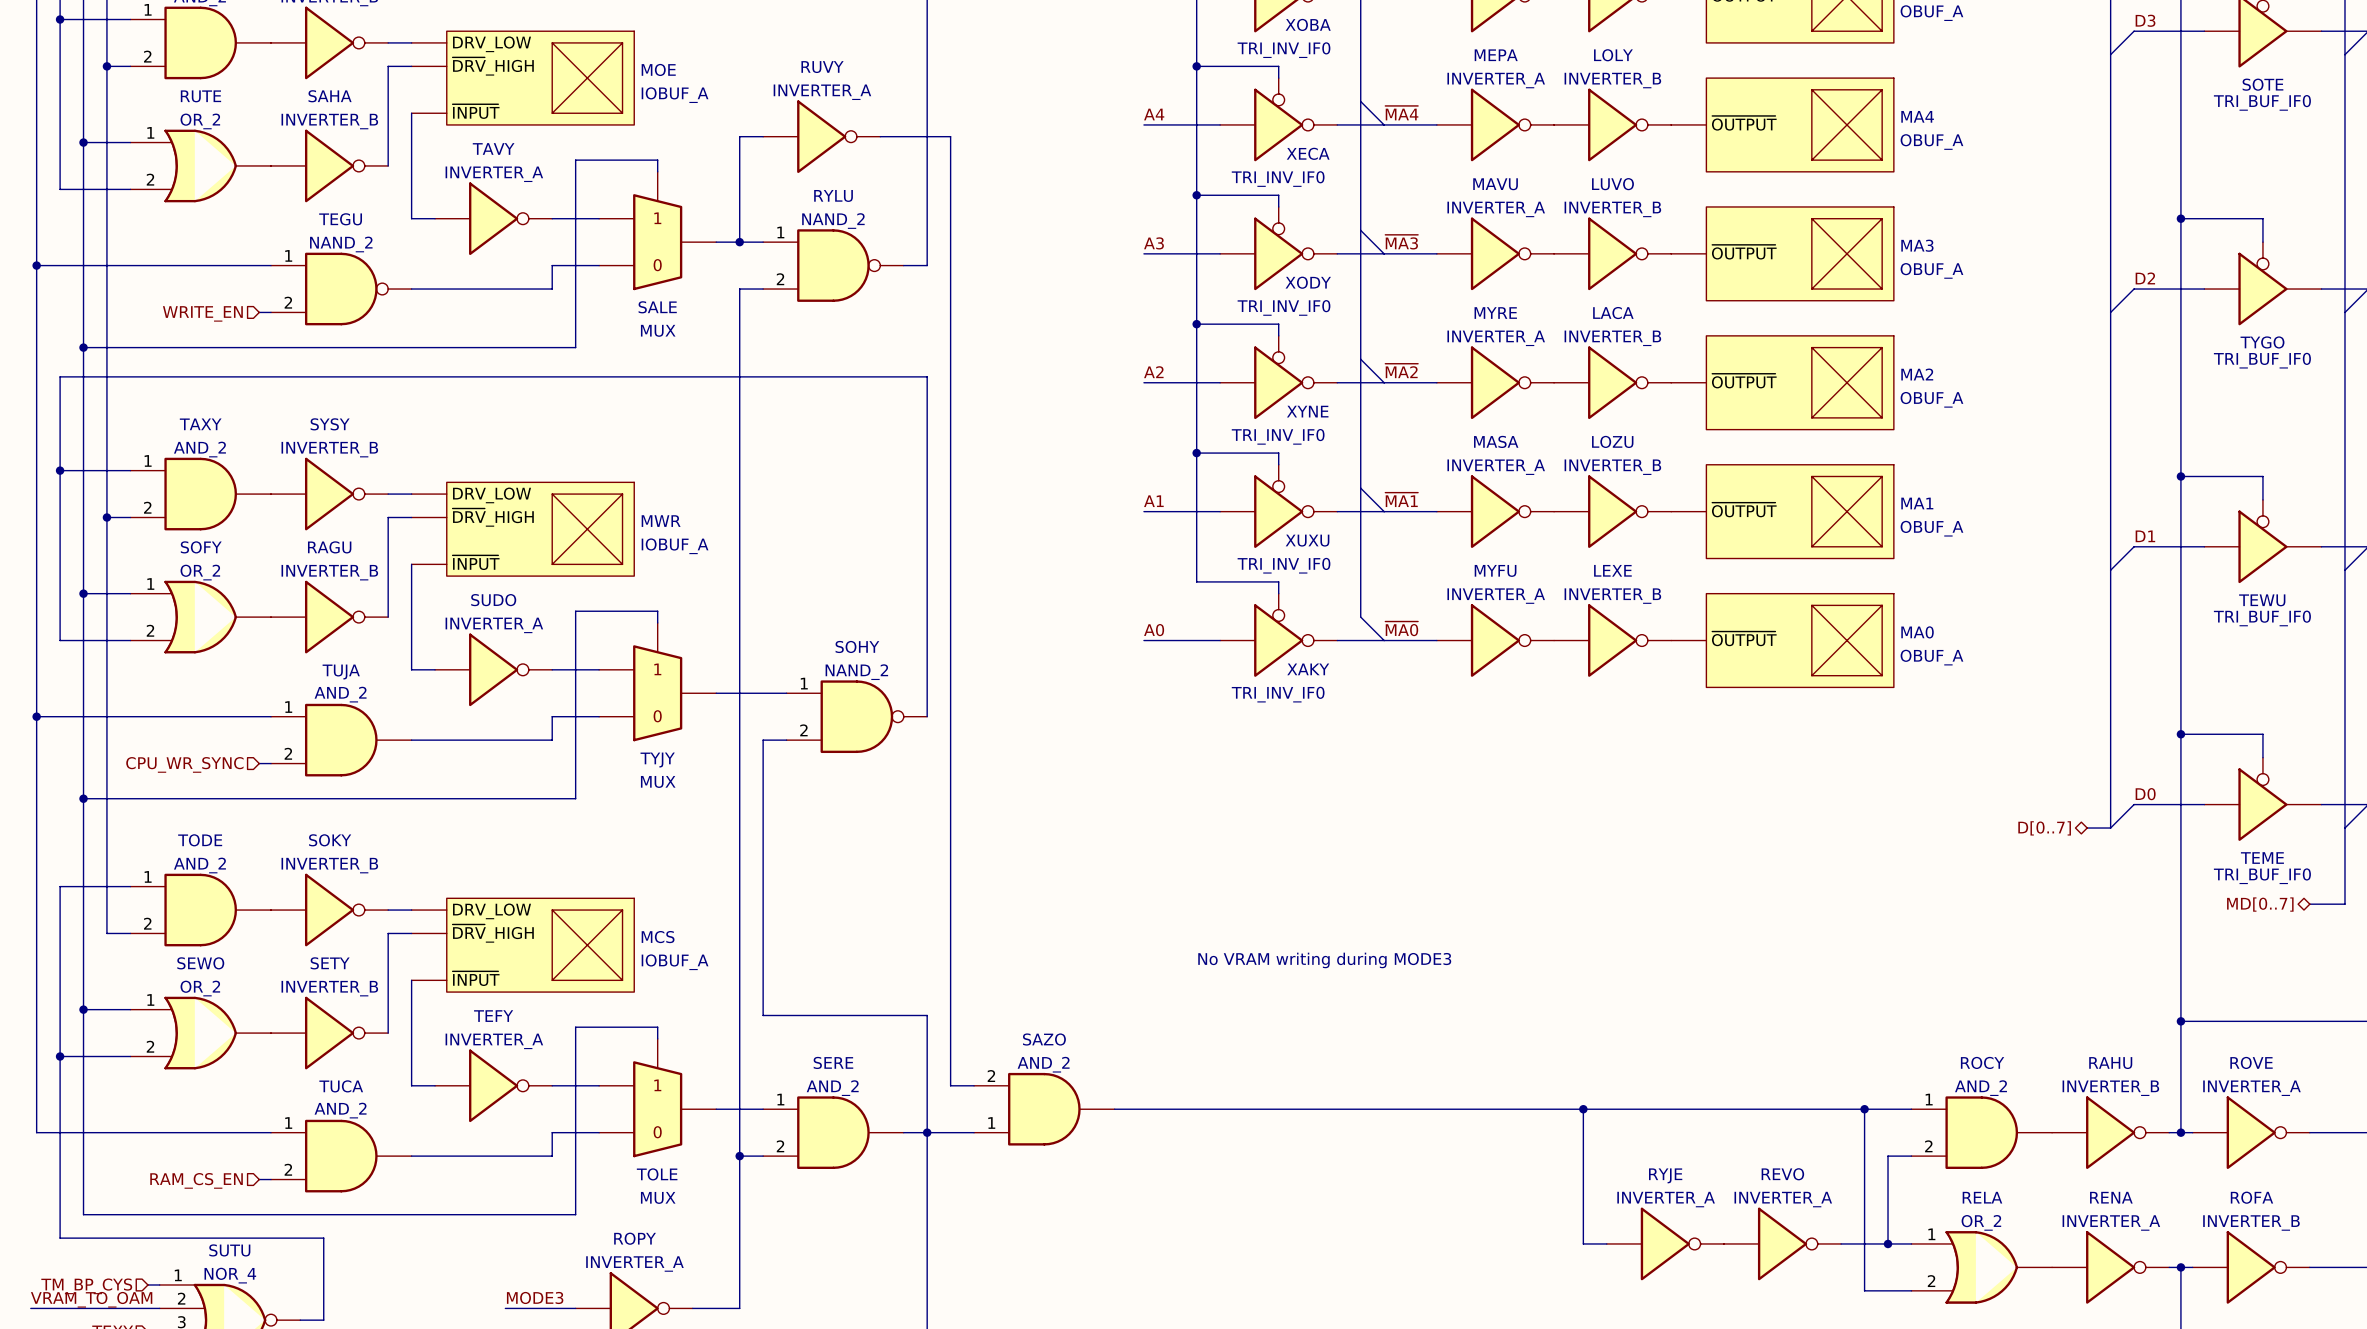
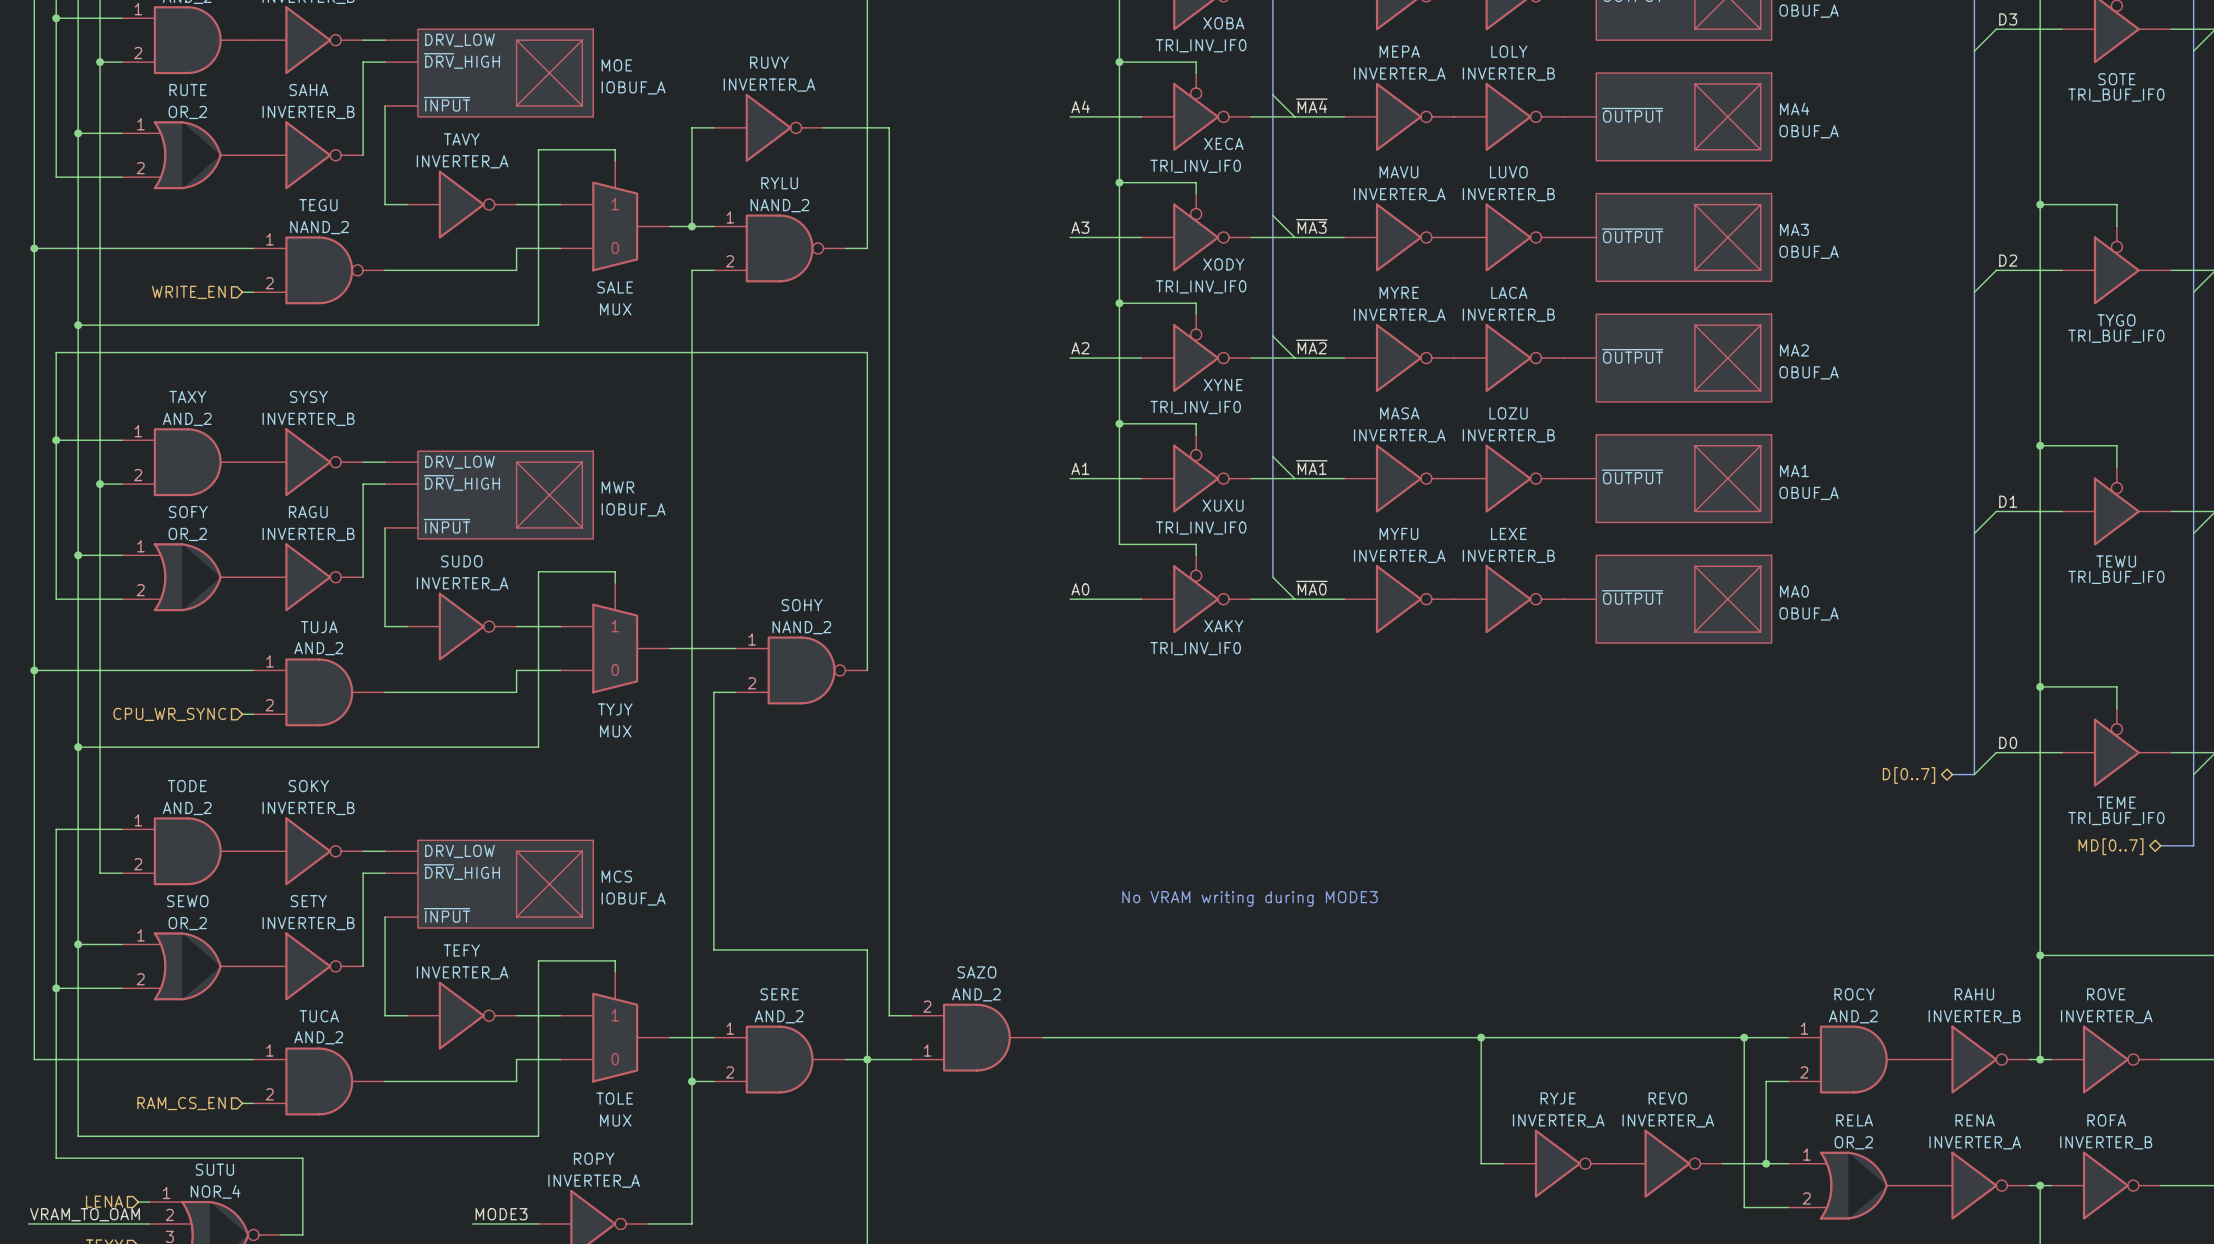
hierarchical label: TM_BP_CYS (86, 1286) -> LENA (104, 1201)

